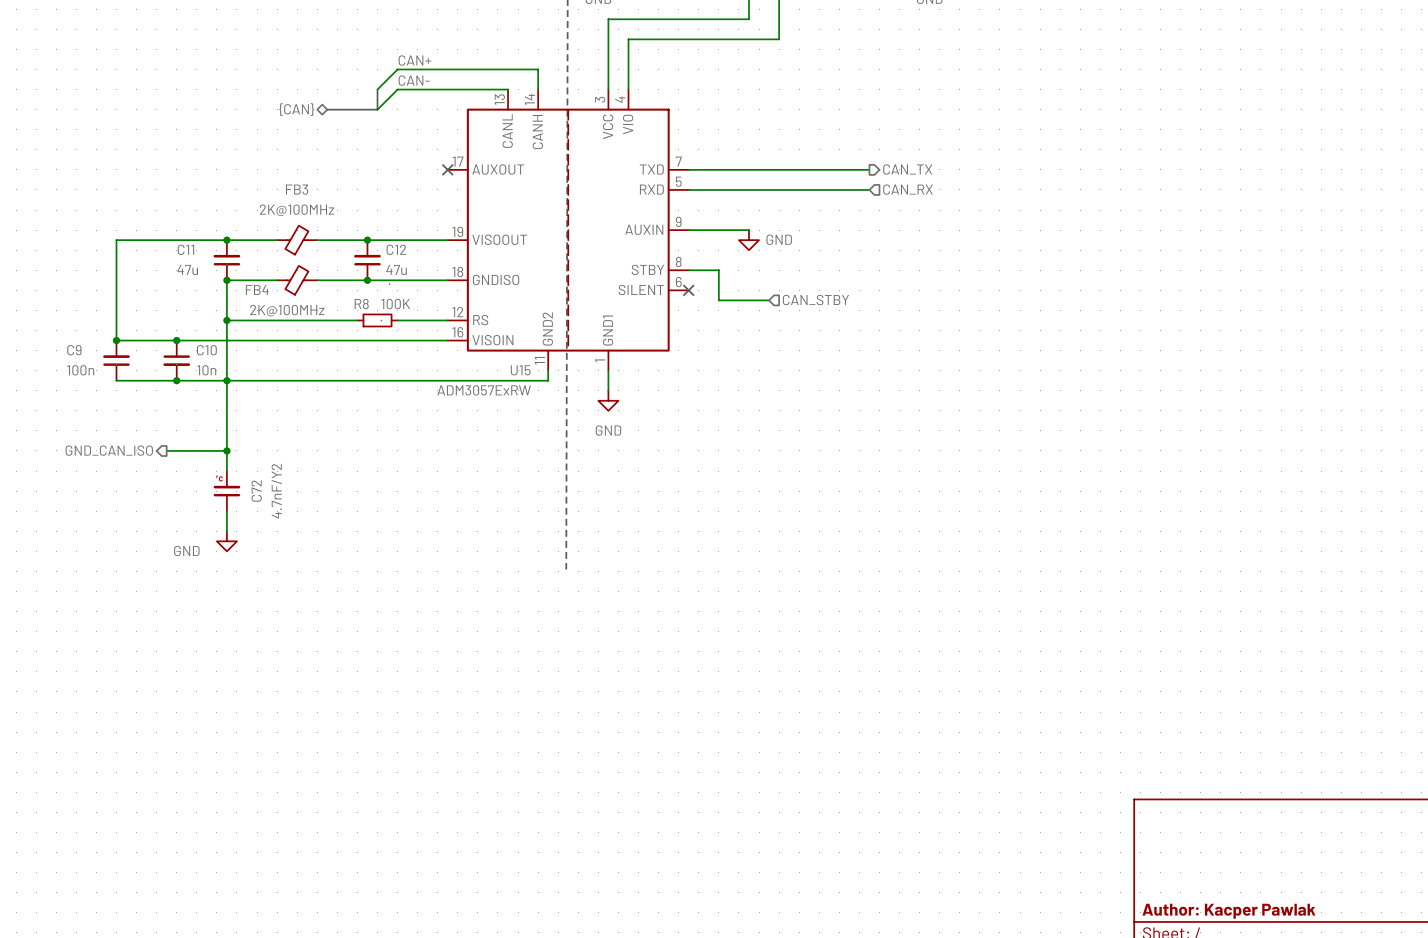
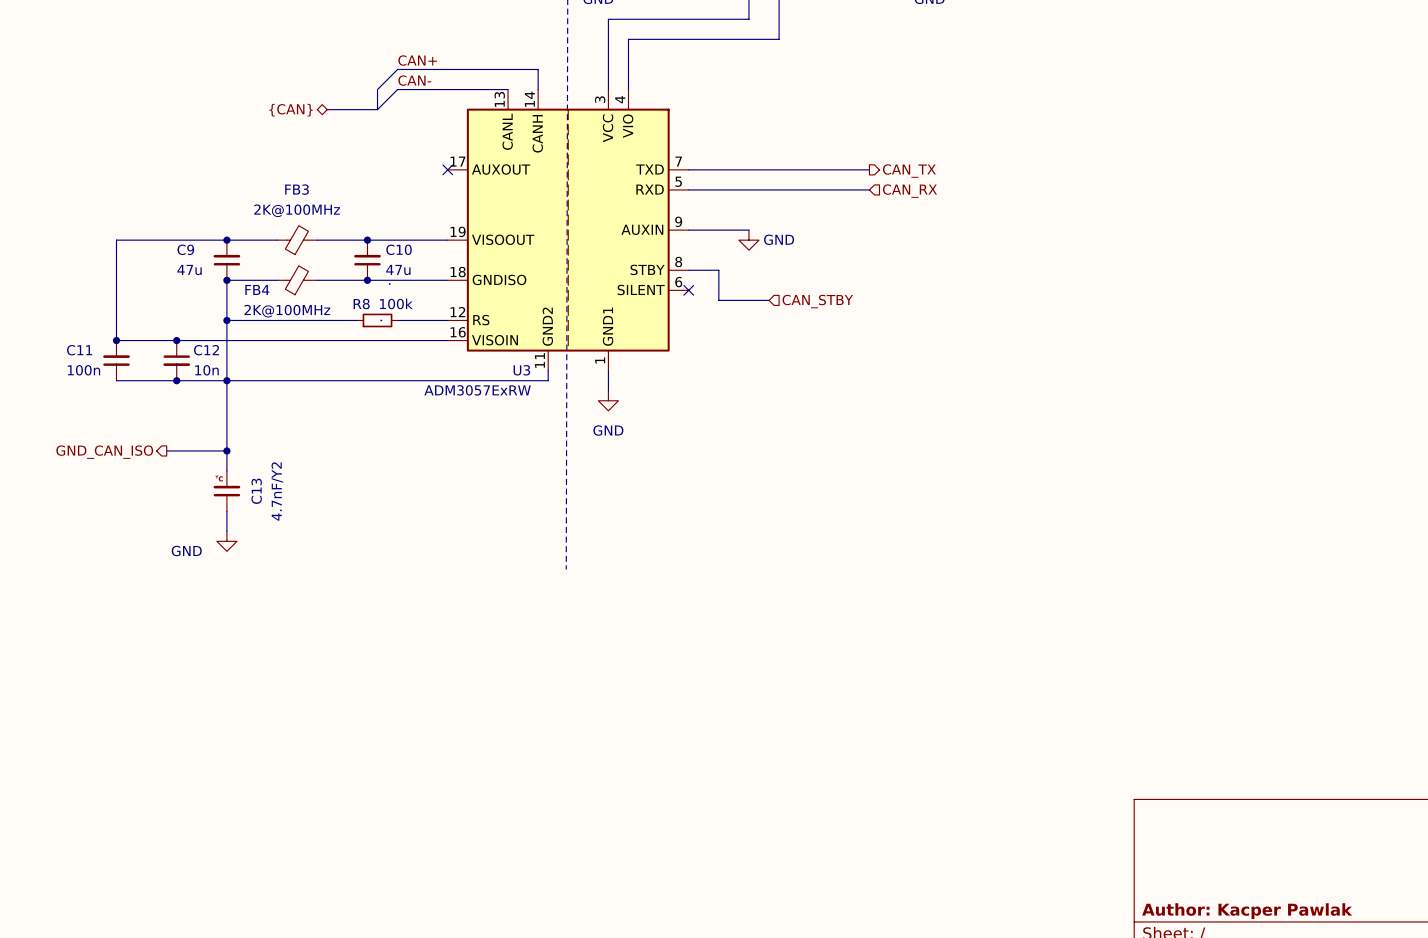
C11 name: C11 (185, 249) -> C9 (185, 249)
C12 name: C12 (396, 249) -> C10 (399, 249)
R8 value: 100K (395, 304) -> 100k (396, 303)
C9 name: C9 (74, 350) -> C11 (79, 350)
C10 name: C10 (206, 350) -> C12 (206, 350)
U15 name: U15 (520, 370) -> U3 (521, 370)
C72 name: C72 (256, 491) -> C13 (256, 491)

